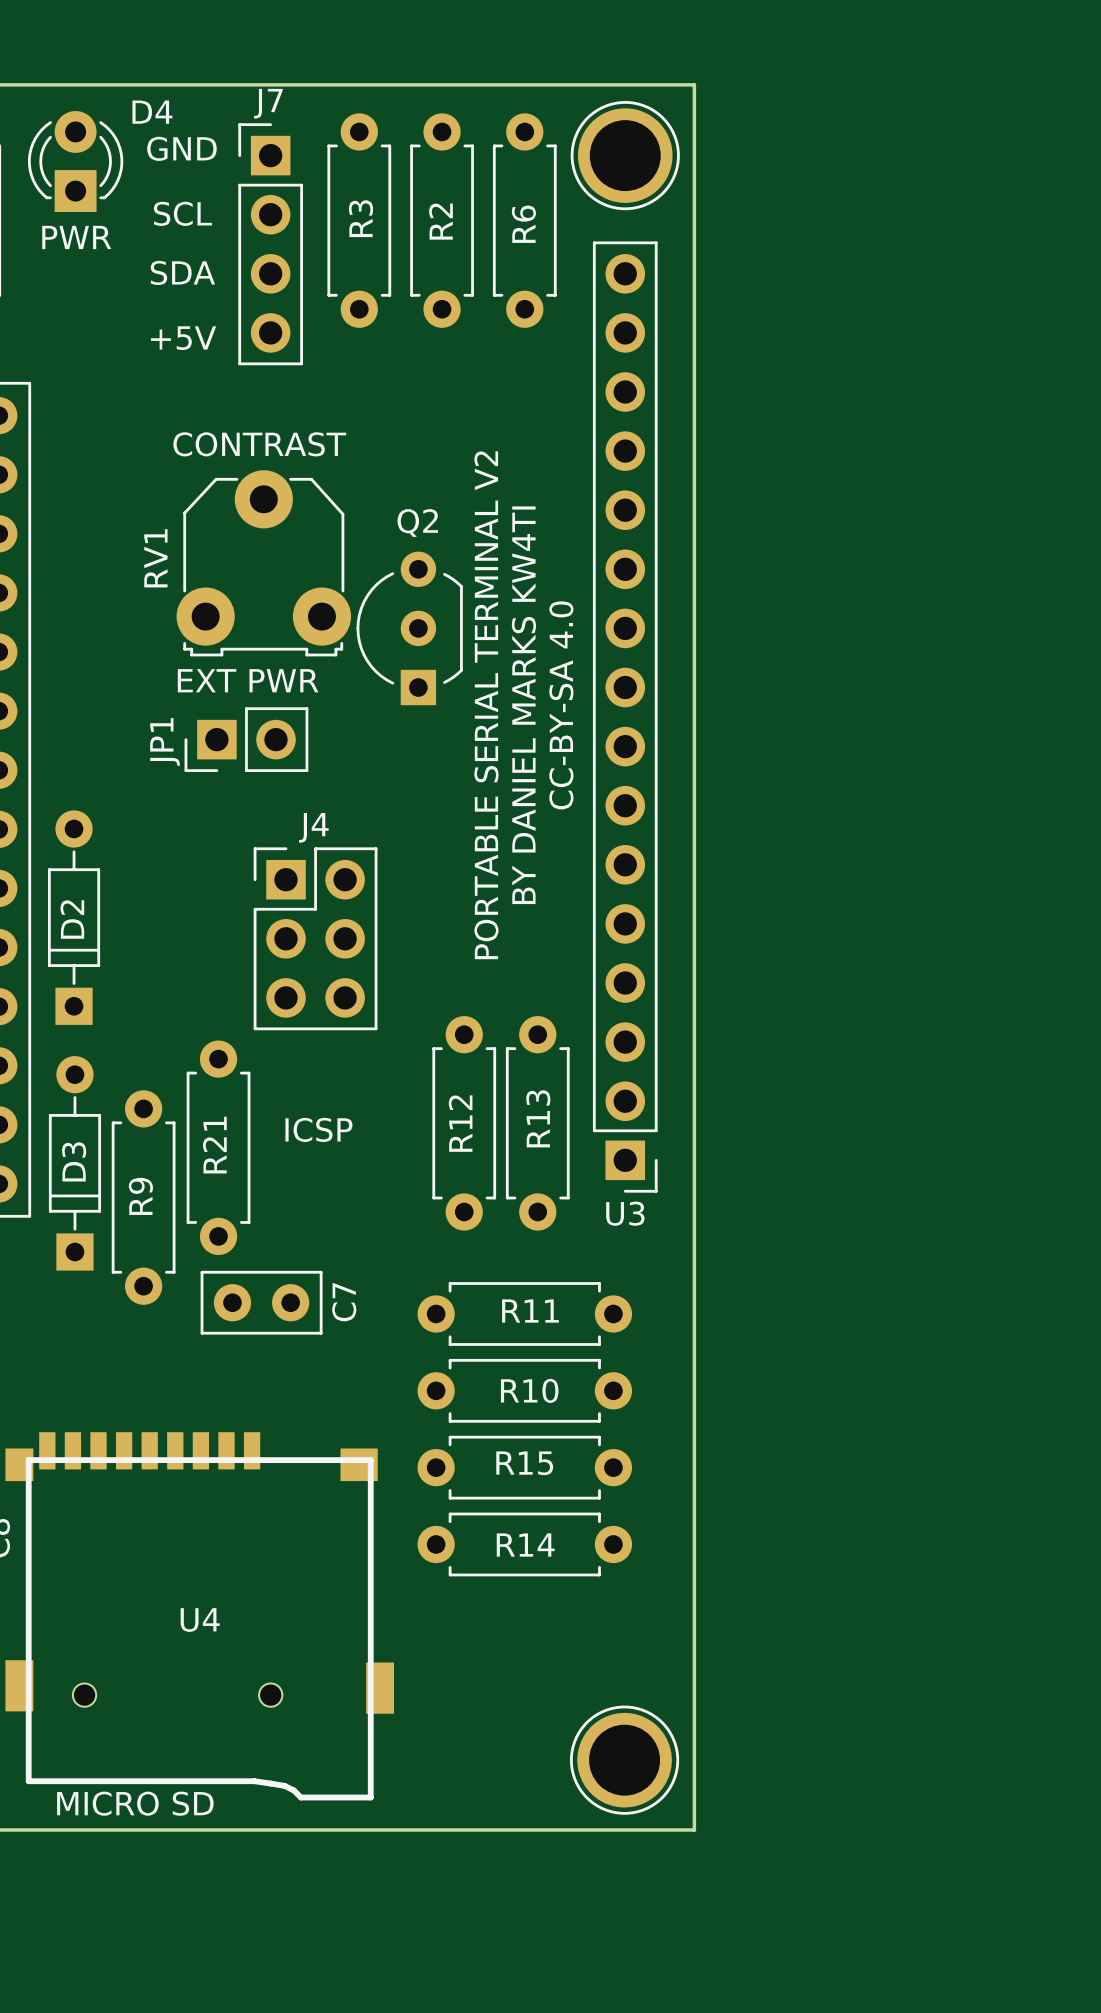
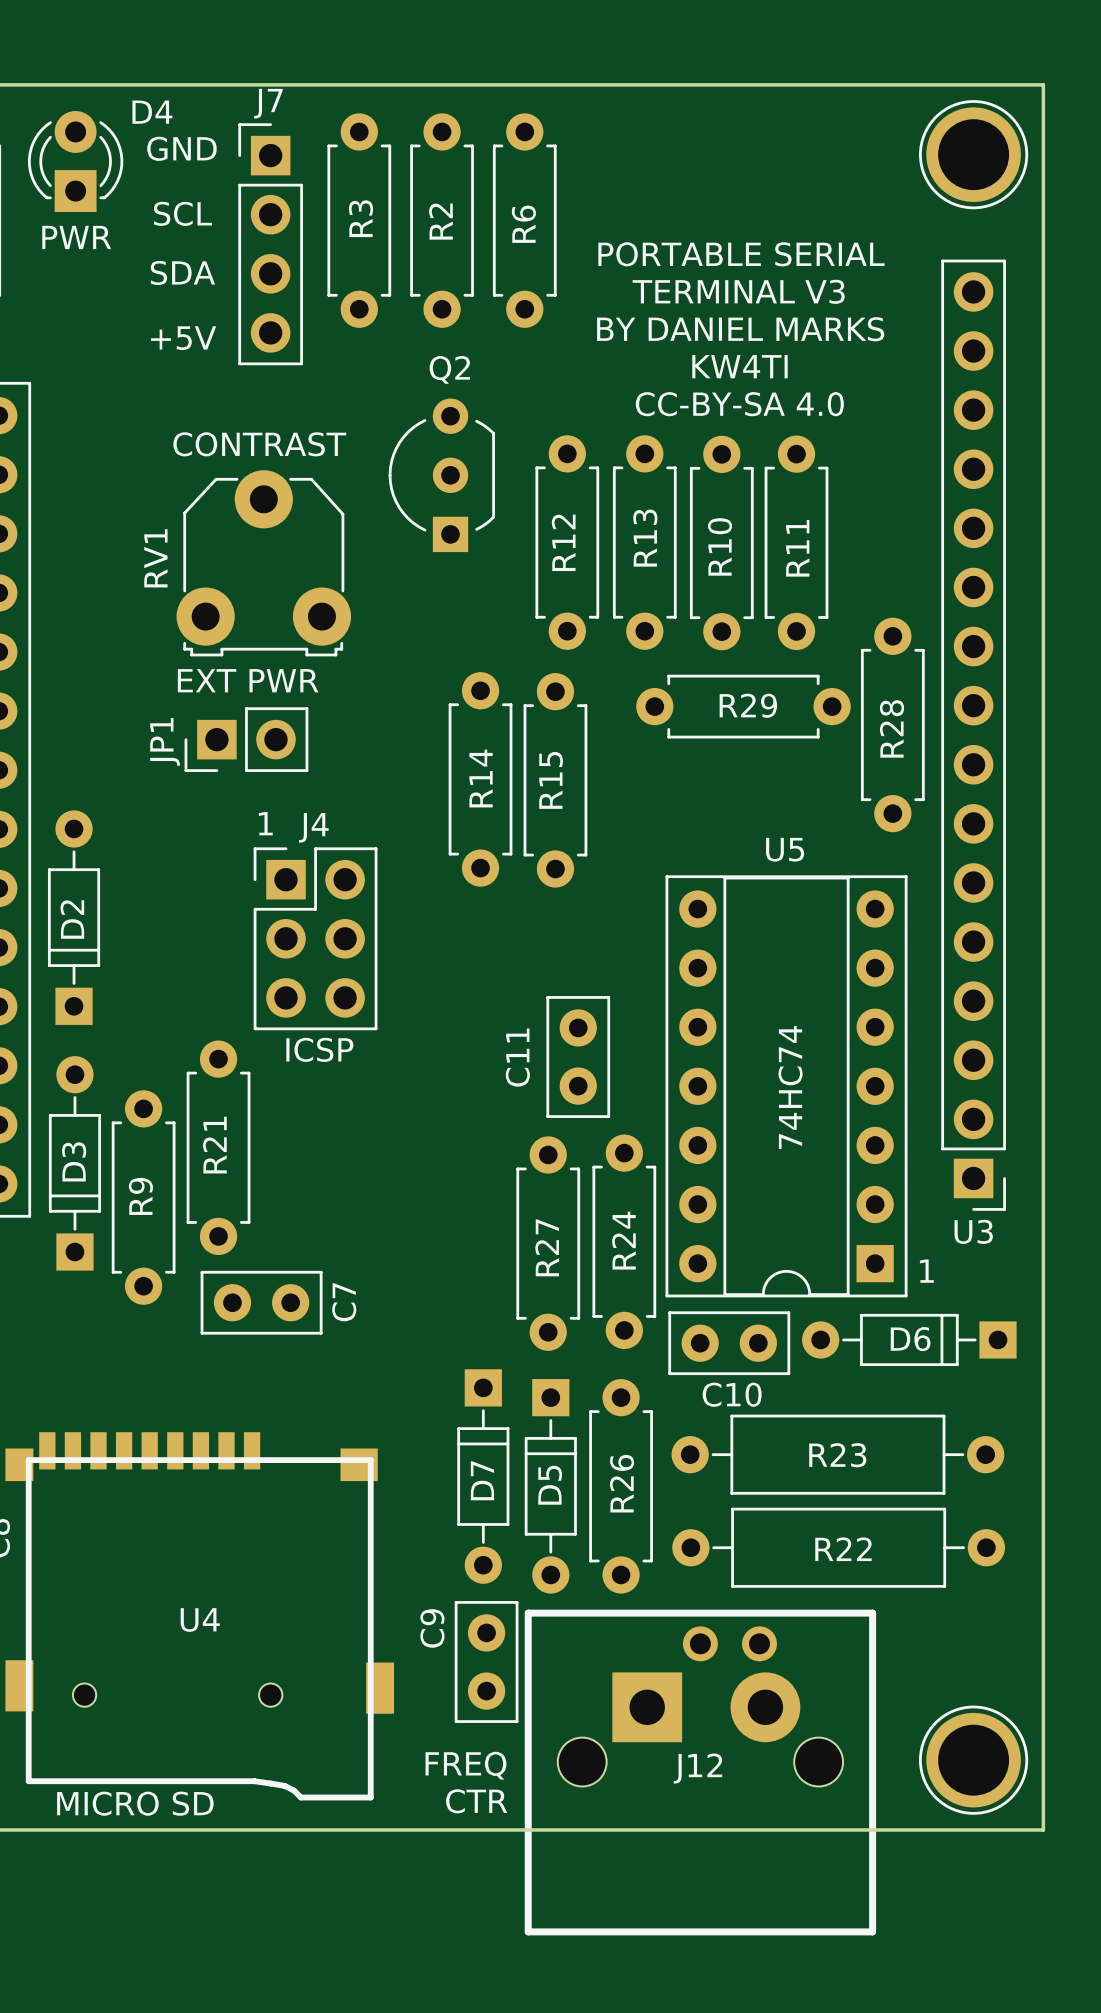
board edge: (694, 84) (694, 1829) -> (694, 84) (1043, 84) (1043, 1829) (694, 1829)
part position: (625, 155) -> (973, 154)
text: none -> PORTABLE SERIAL (741, 254)
text: none -> TERMINAL V3 (738, 291)
text: none -> BY DANIEL MARKS (740, 329)
text: none -> KW4TI (739, 366)
Q2 position: (409, 628) -> (441, 475)
text: PORTABLE SERIAL TERMINAL V2 (486, 705) -> none
text: BY DANIEL MARKS KW4TI (523, 705) -> none
text rotation: 0° (561, 705) -> 90° clockwise (739, 404)
text position: CC-BY-SA 4.0 (561, 705) -> CC-BY-SA 4.0 (739, 404)
R29: none -> (743, 706)
U3 position: (625, 717) -> (973, 735)
R28: none -> (892, 724)
text: none -> 1 (265, 823)
C11: none -> (578, 1057)
U5: none -> (786, 1086)
text: none -> 74HC74 (790, 1087)
R12 position: (464, 1123) -> (567, 542)
R13 position: (537, 1123) -> (644, 542)
text position: ICSP (318, 1129) -> ICSP (319, 1049)
R24: none -> (624, 1241)
R27: none -> (548, 1243)
text: none -> 1 (926, 1271)
R11 rotation: 0° (524, 1313) -> 90° clockwise (796, 542)
R11 position: (524, 1313) -> (796, 542)
D6: none -> (909, 1339)
C10: none -> (729, 1343)
R10 rotation: 0° (524, 1390) -> 90° clockwise (721, 543)
R10 position: (524, 1390) -> (721, 543)
R23: none -> (837, 1454)
R15 rotation: 0° (524, 1467) -> 90° clockwise (555, 780)
R15 position: (524, 1467) -> (555, 780)
D7: none -> (483, 1476)
D5: none -> (550, 1486)
R26: none -> (621, 1486)
R14 rotation: 0° (524, 1544) -> 90° clockwise (480, 779)
R14 position: (524, 1544) -> (480, 779)
R22: none -> (838, 1547)
C9: none -> (486, 1661)
part position: (624, 1760) -> (973, 1760)
text: none -> FREQ (465, 1765)
J12: none -> (700, 1772)
text: none -> CTR (476, 1801)

